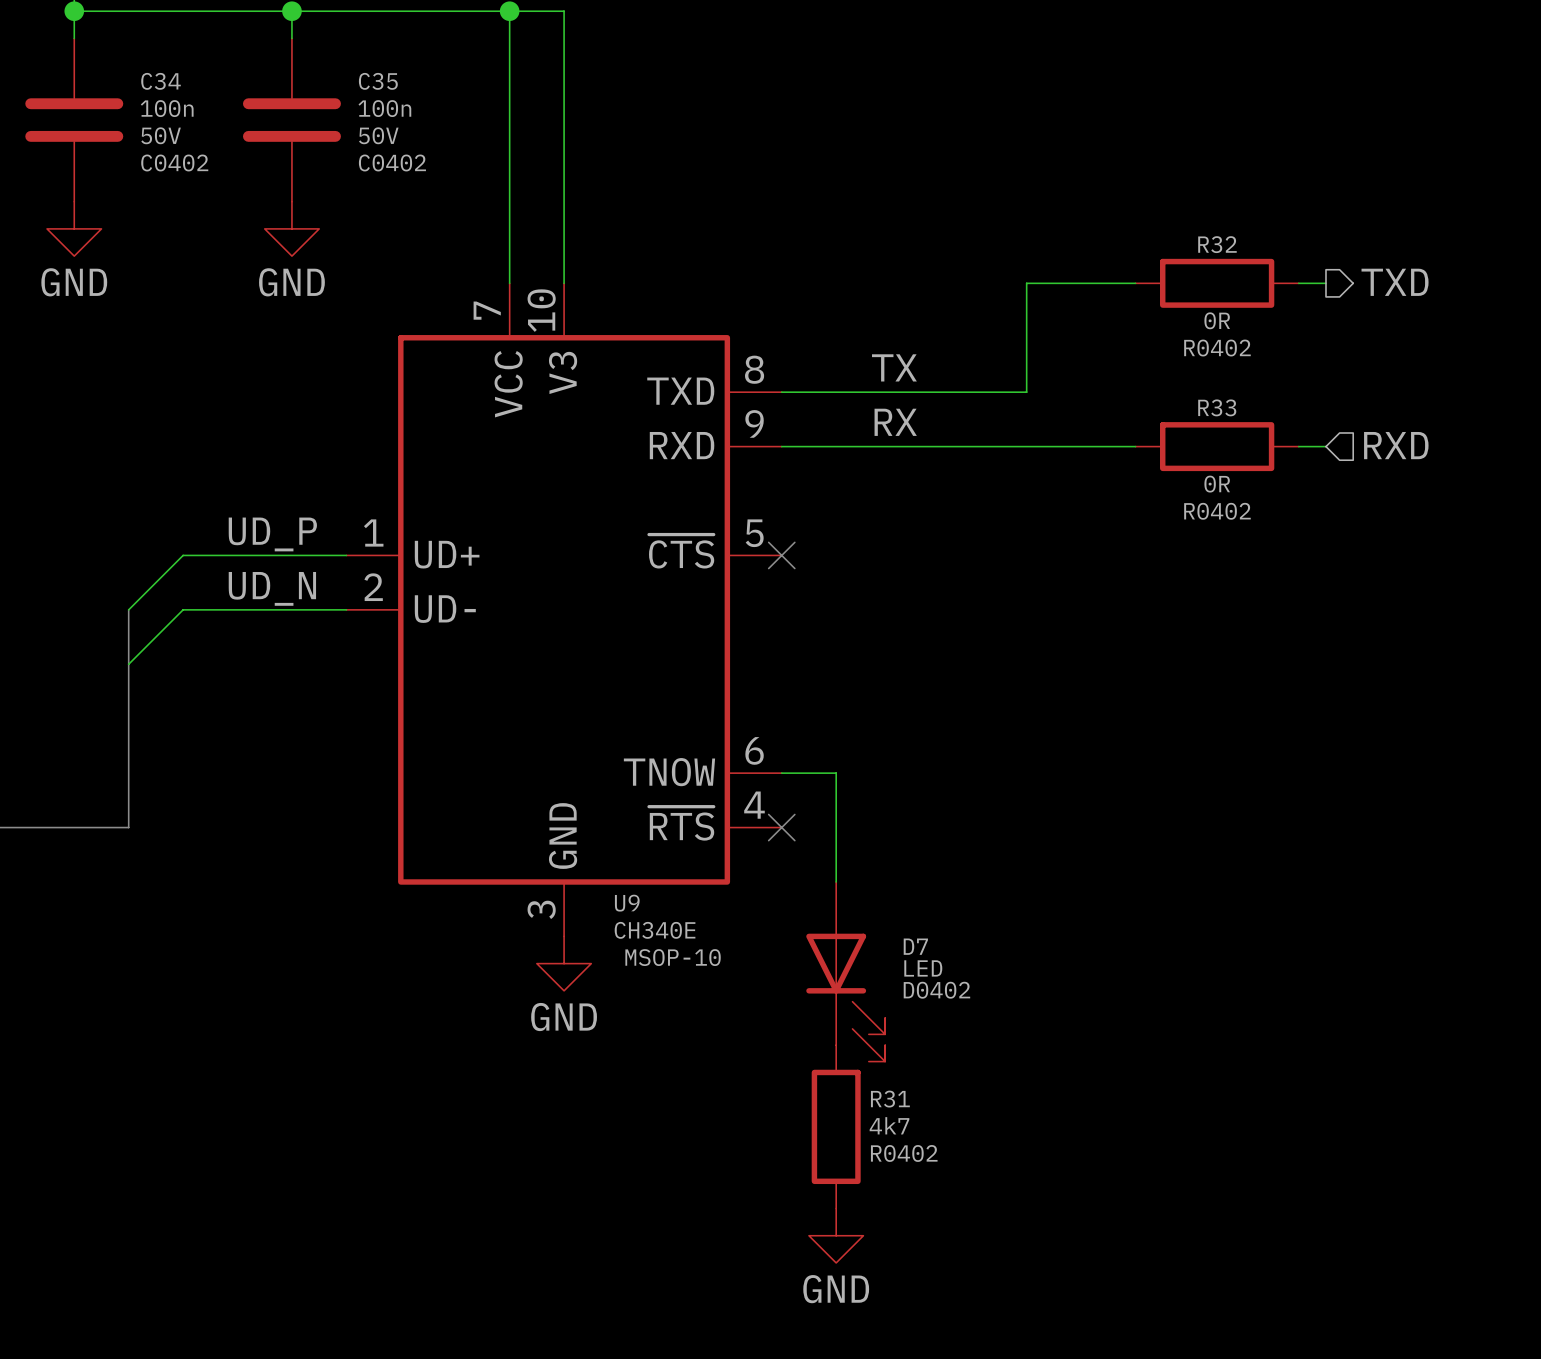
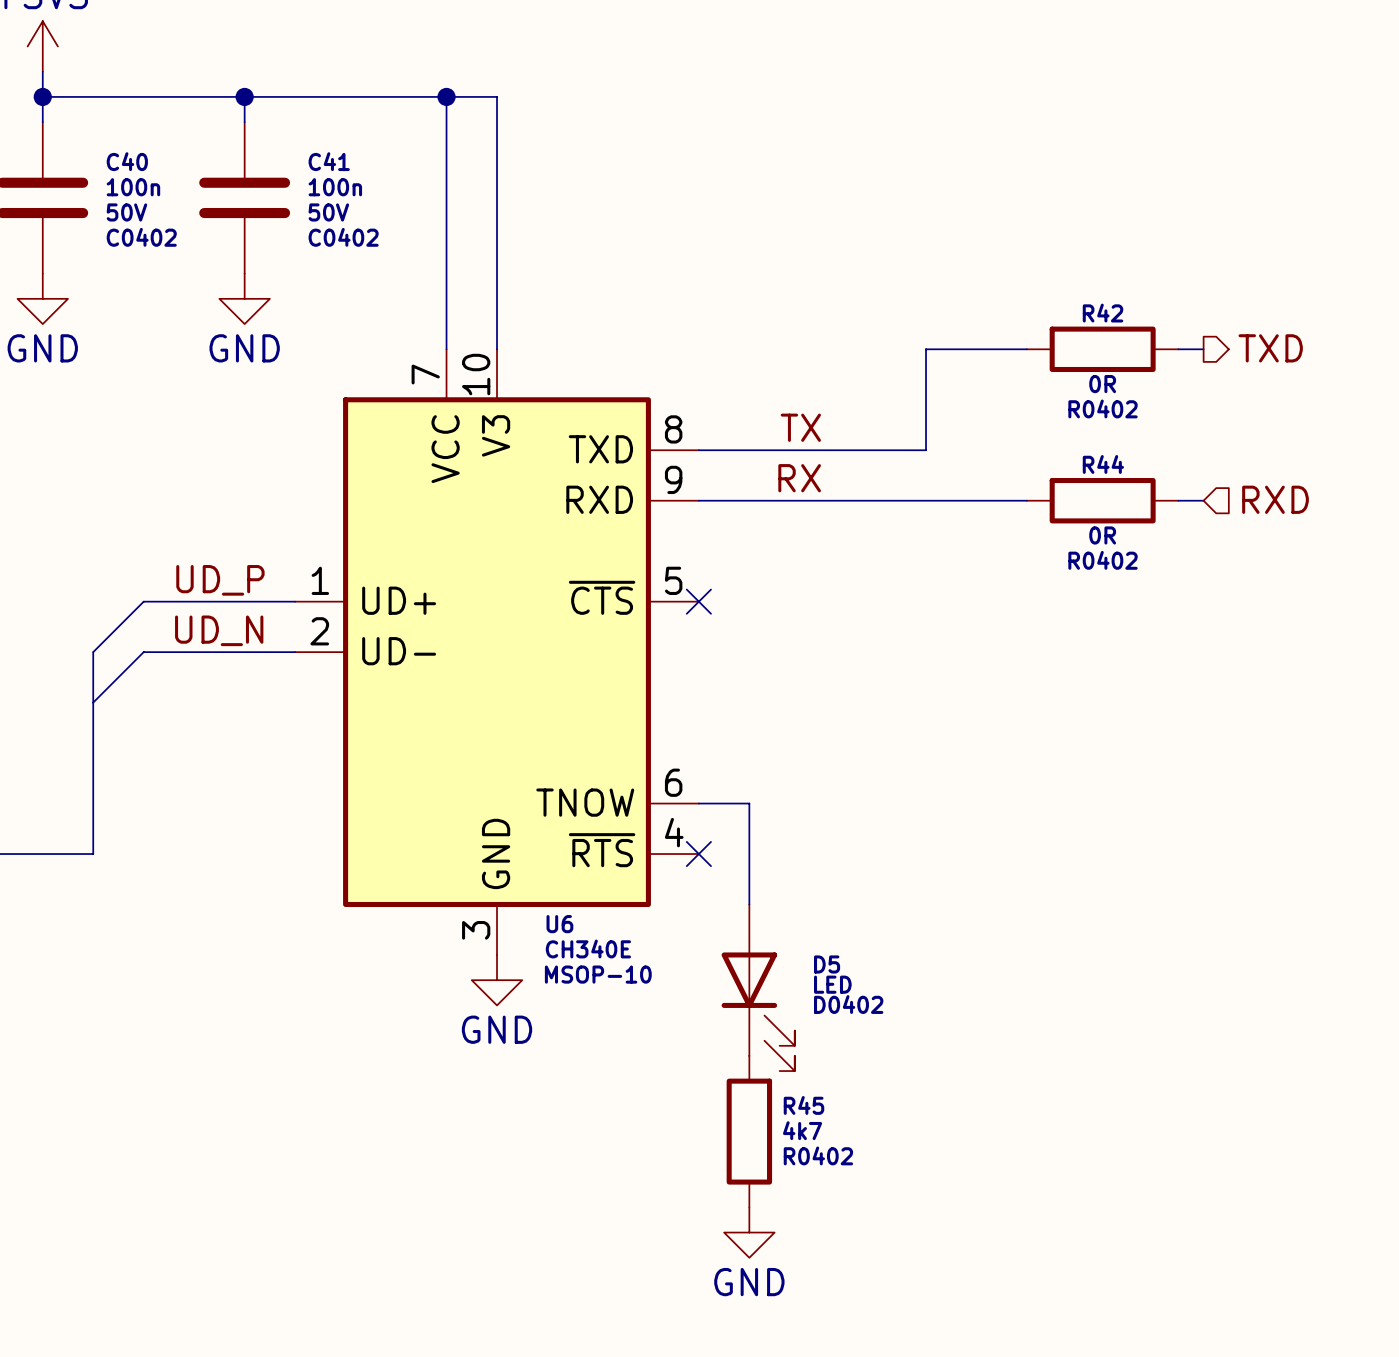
C34 name: C34 (161, 81) -> C40 (127, 161)
C35 name: C35 (378, 81) -> C41 (329, 161)
R32 name: R32 (1217, 244) -> R42 (1103, 313)
R33 name: R33 (1217, 407) -> R44 (1103, 464)
U9 name: U9 (627, 903) -> U6 (559, 924)
D7 name: D7 (915, 946) -> D5 (827, 964)
R31 name: R31 (890, 1099) -> R45 (803, 1105)

